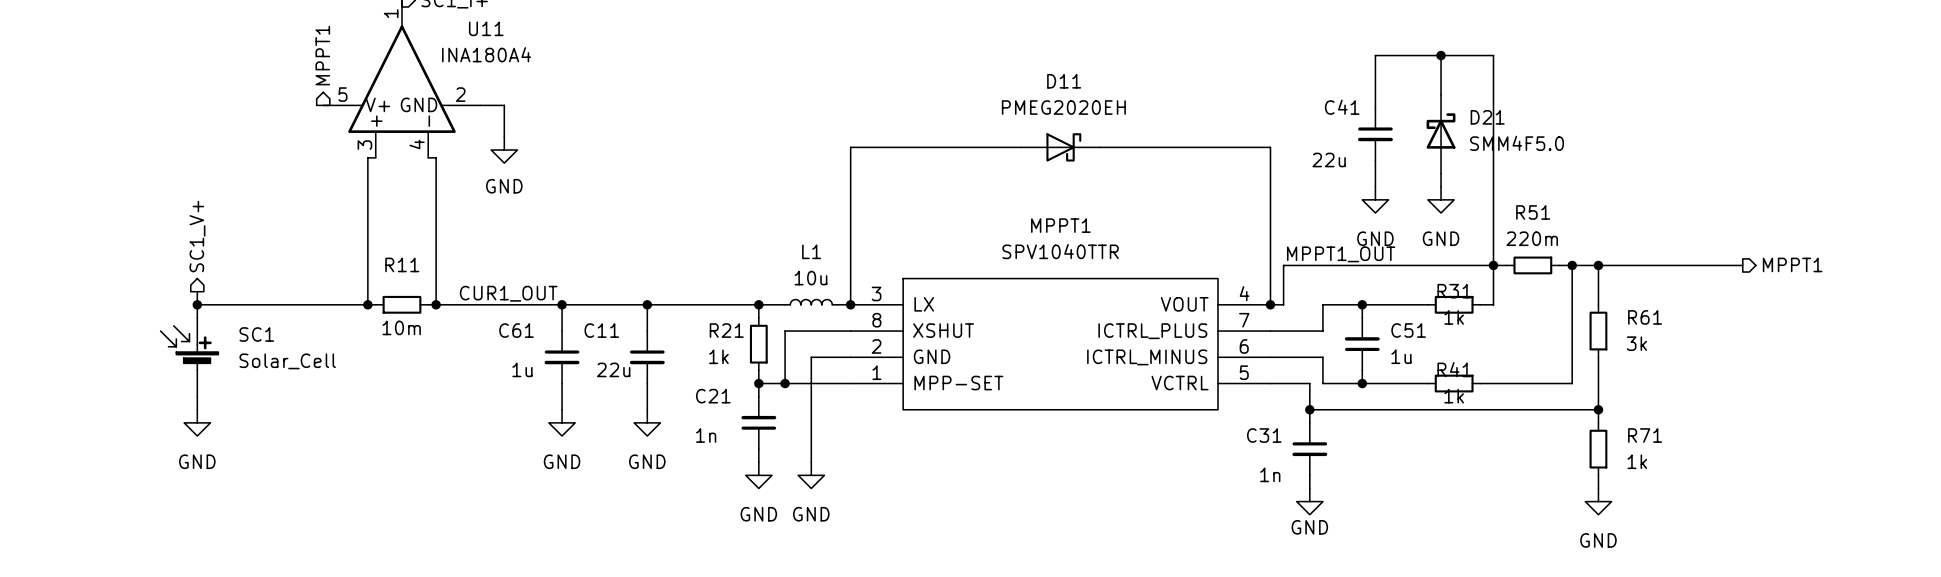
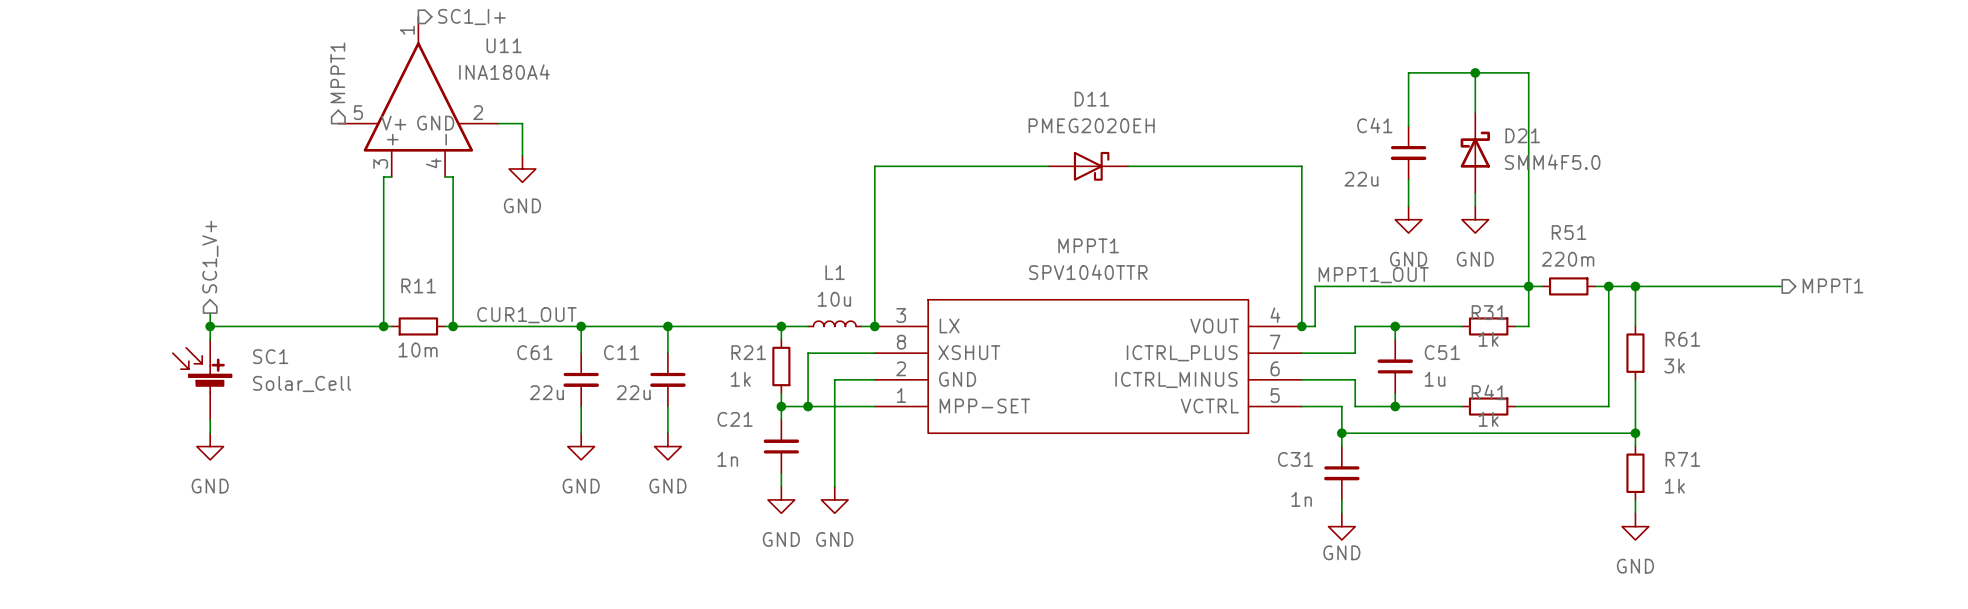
C61 value: 1u (522, 369) -> 22u (546, 392)

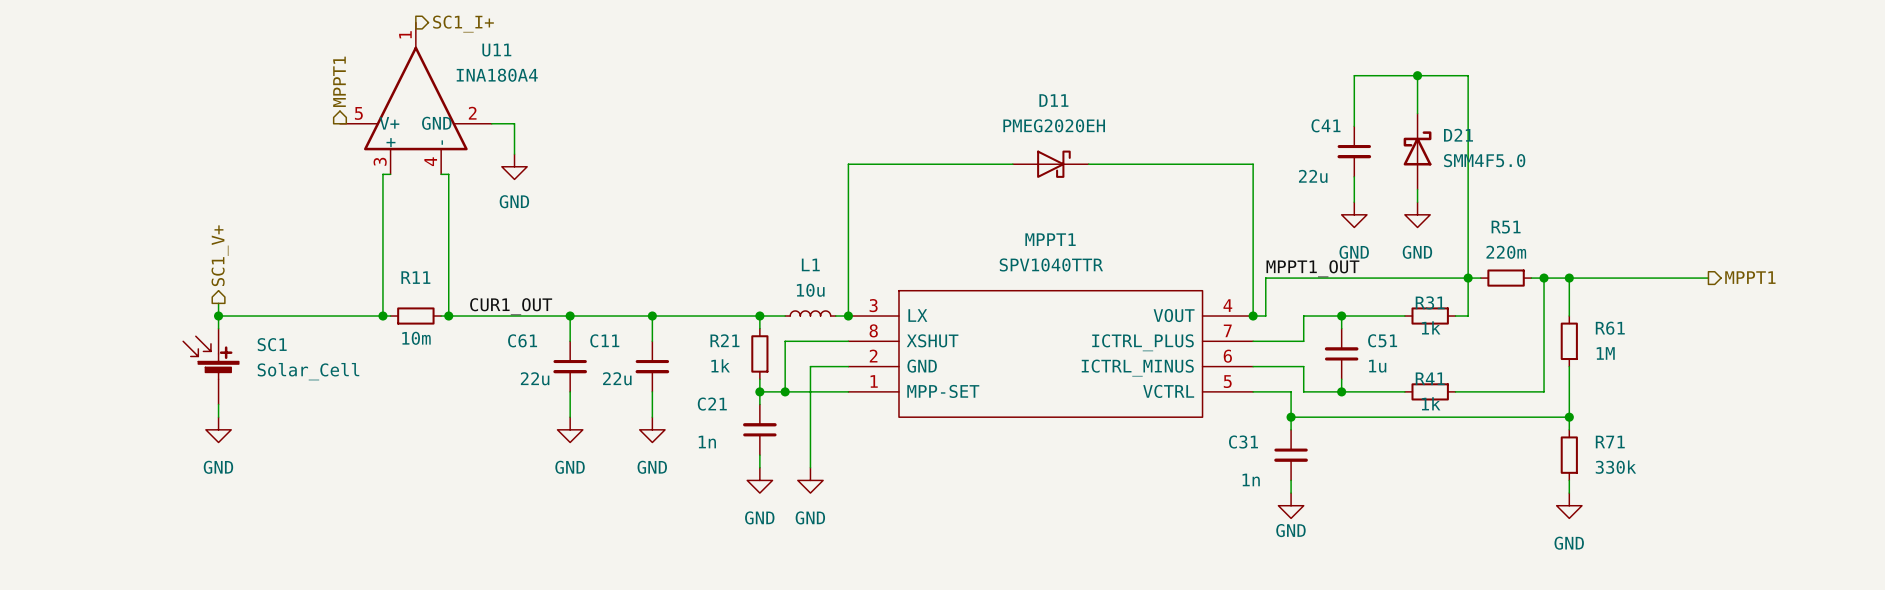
R61 value: 3k (1674, 365) -> 1M (1605, 353)
R71 value: 1k (1674, 486) -> 330k (1615, 467)

